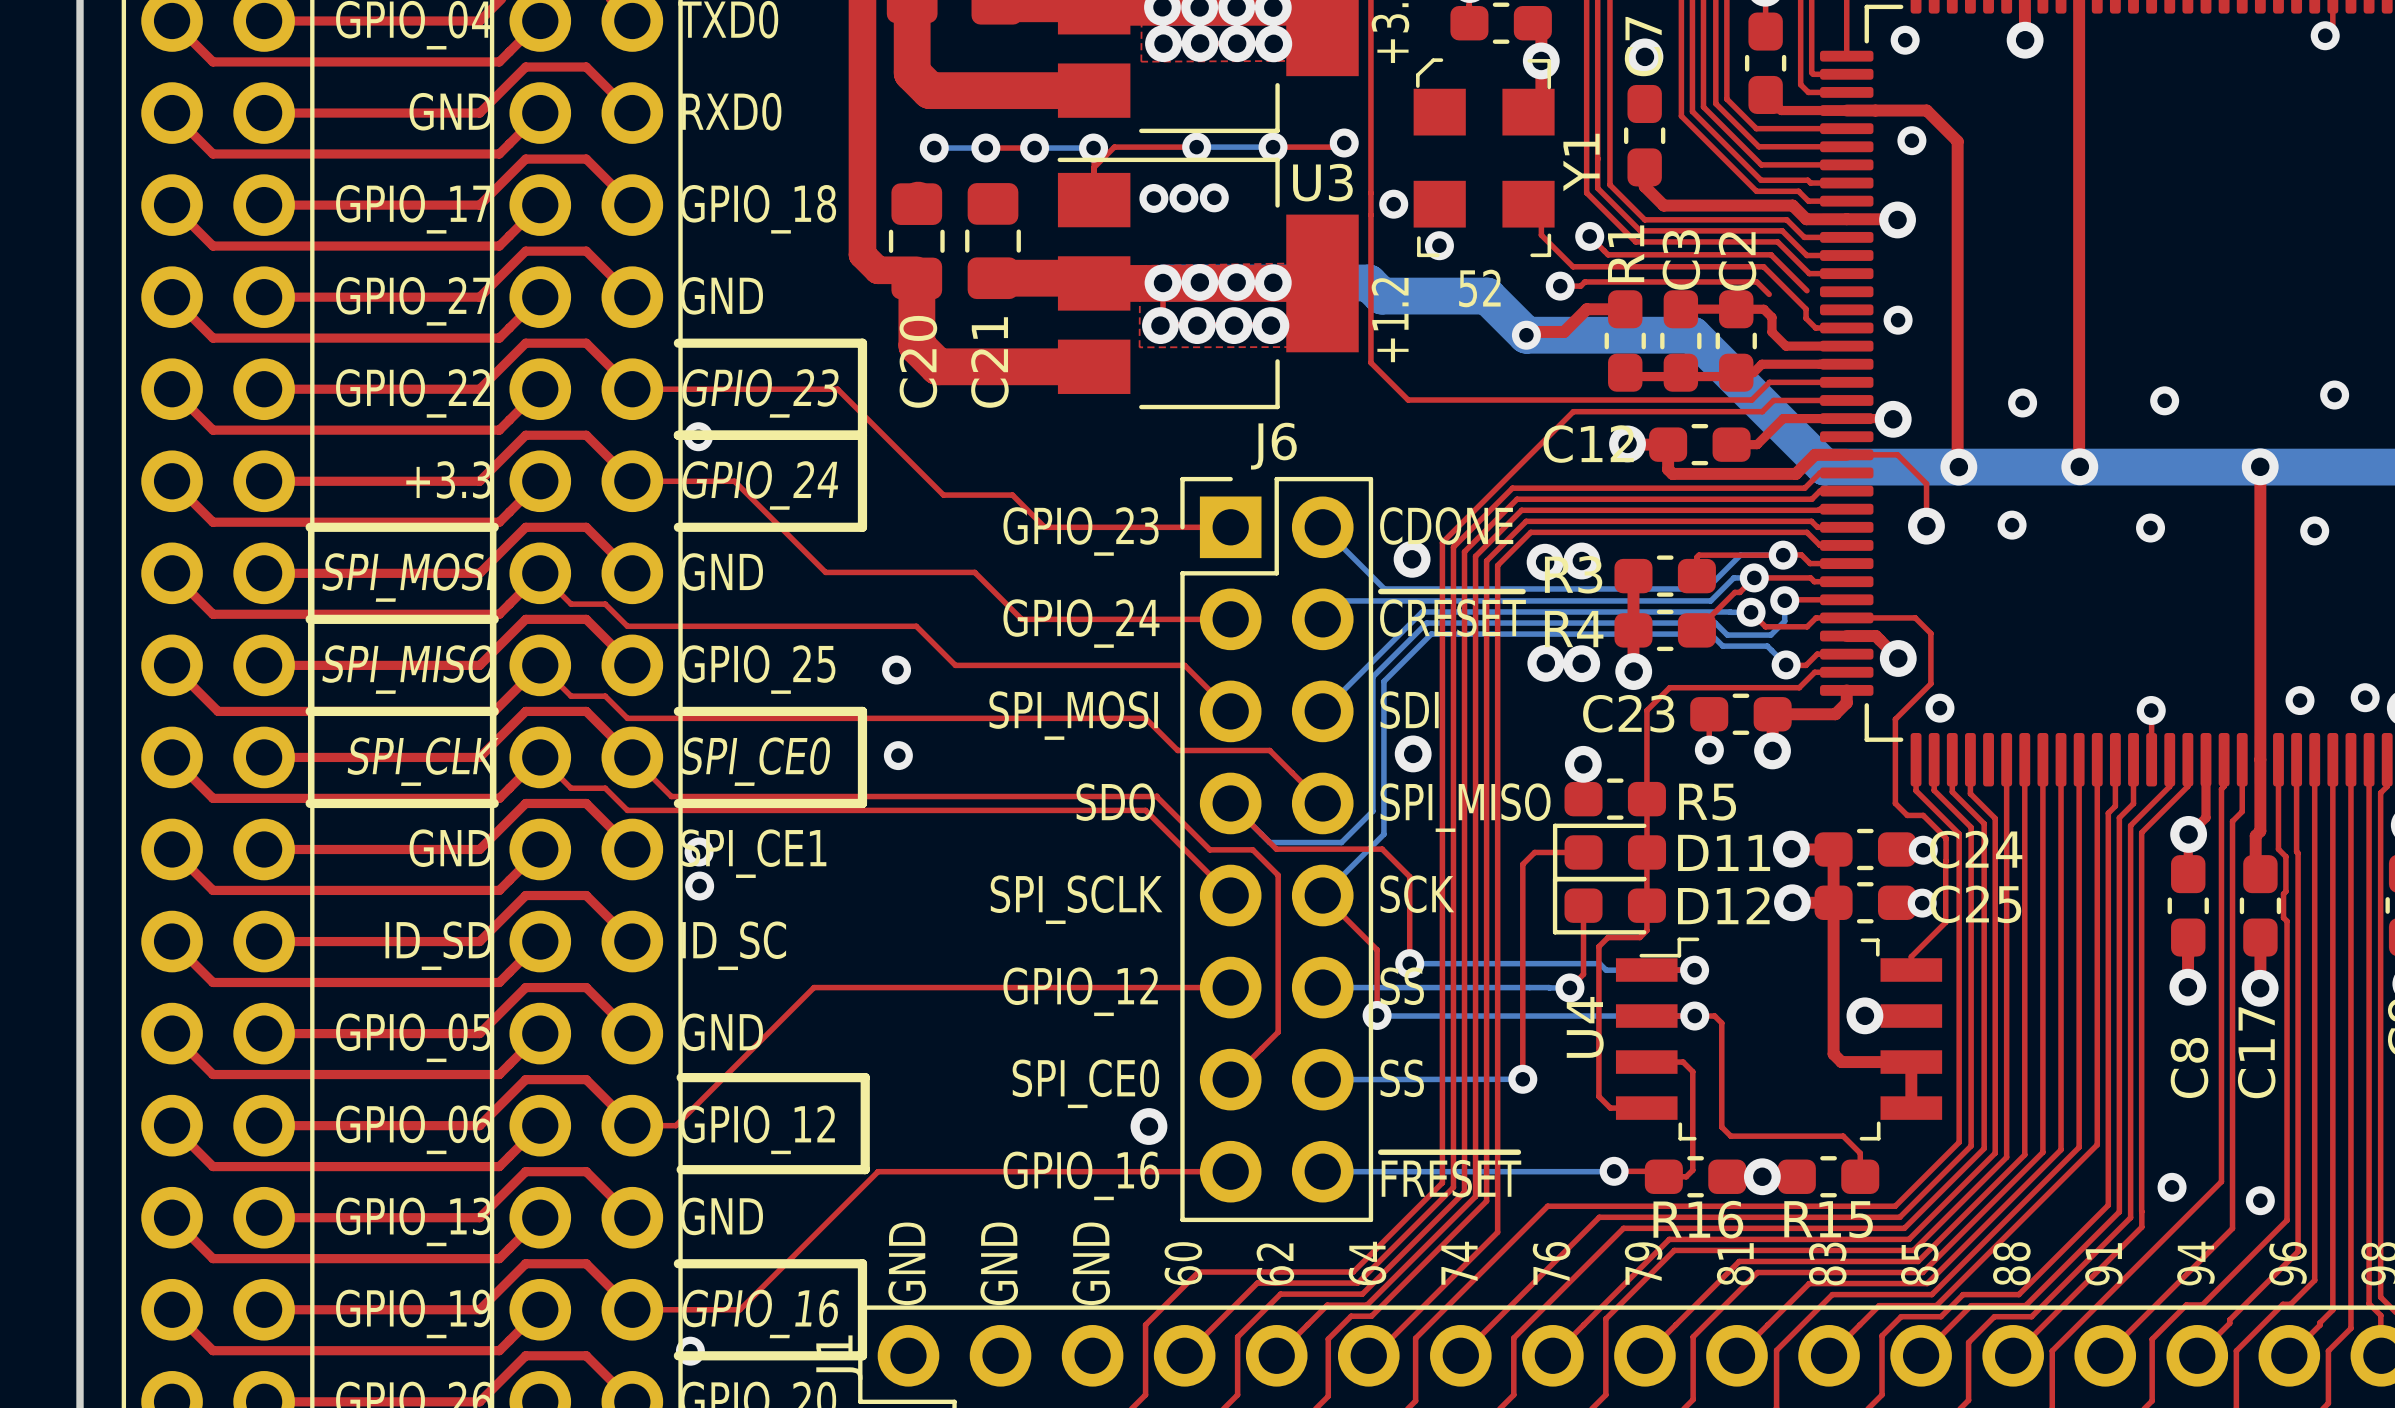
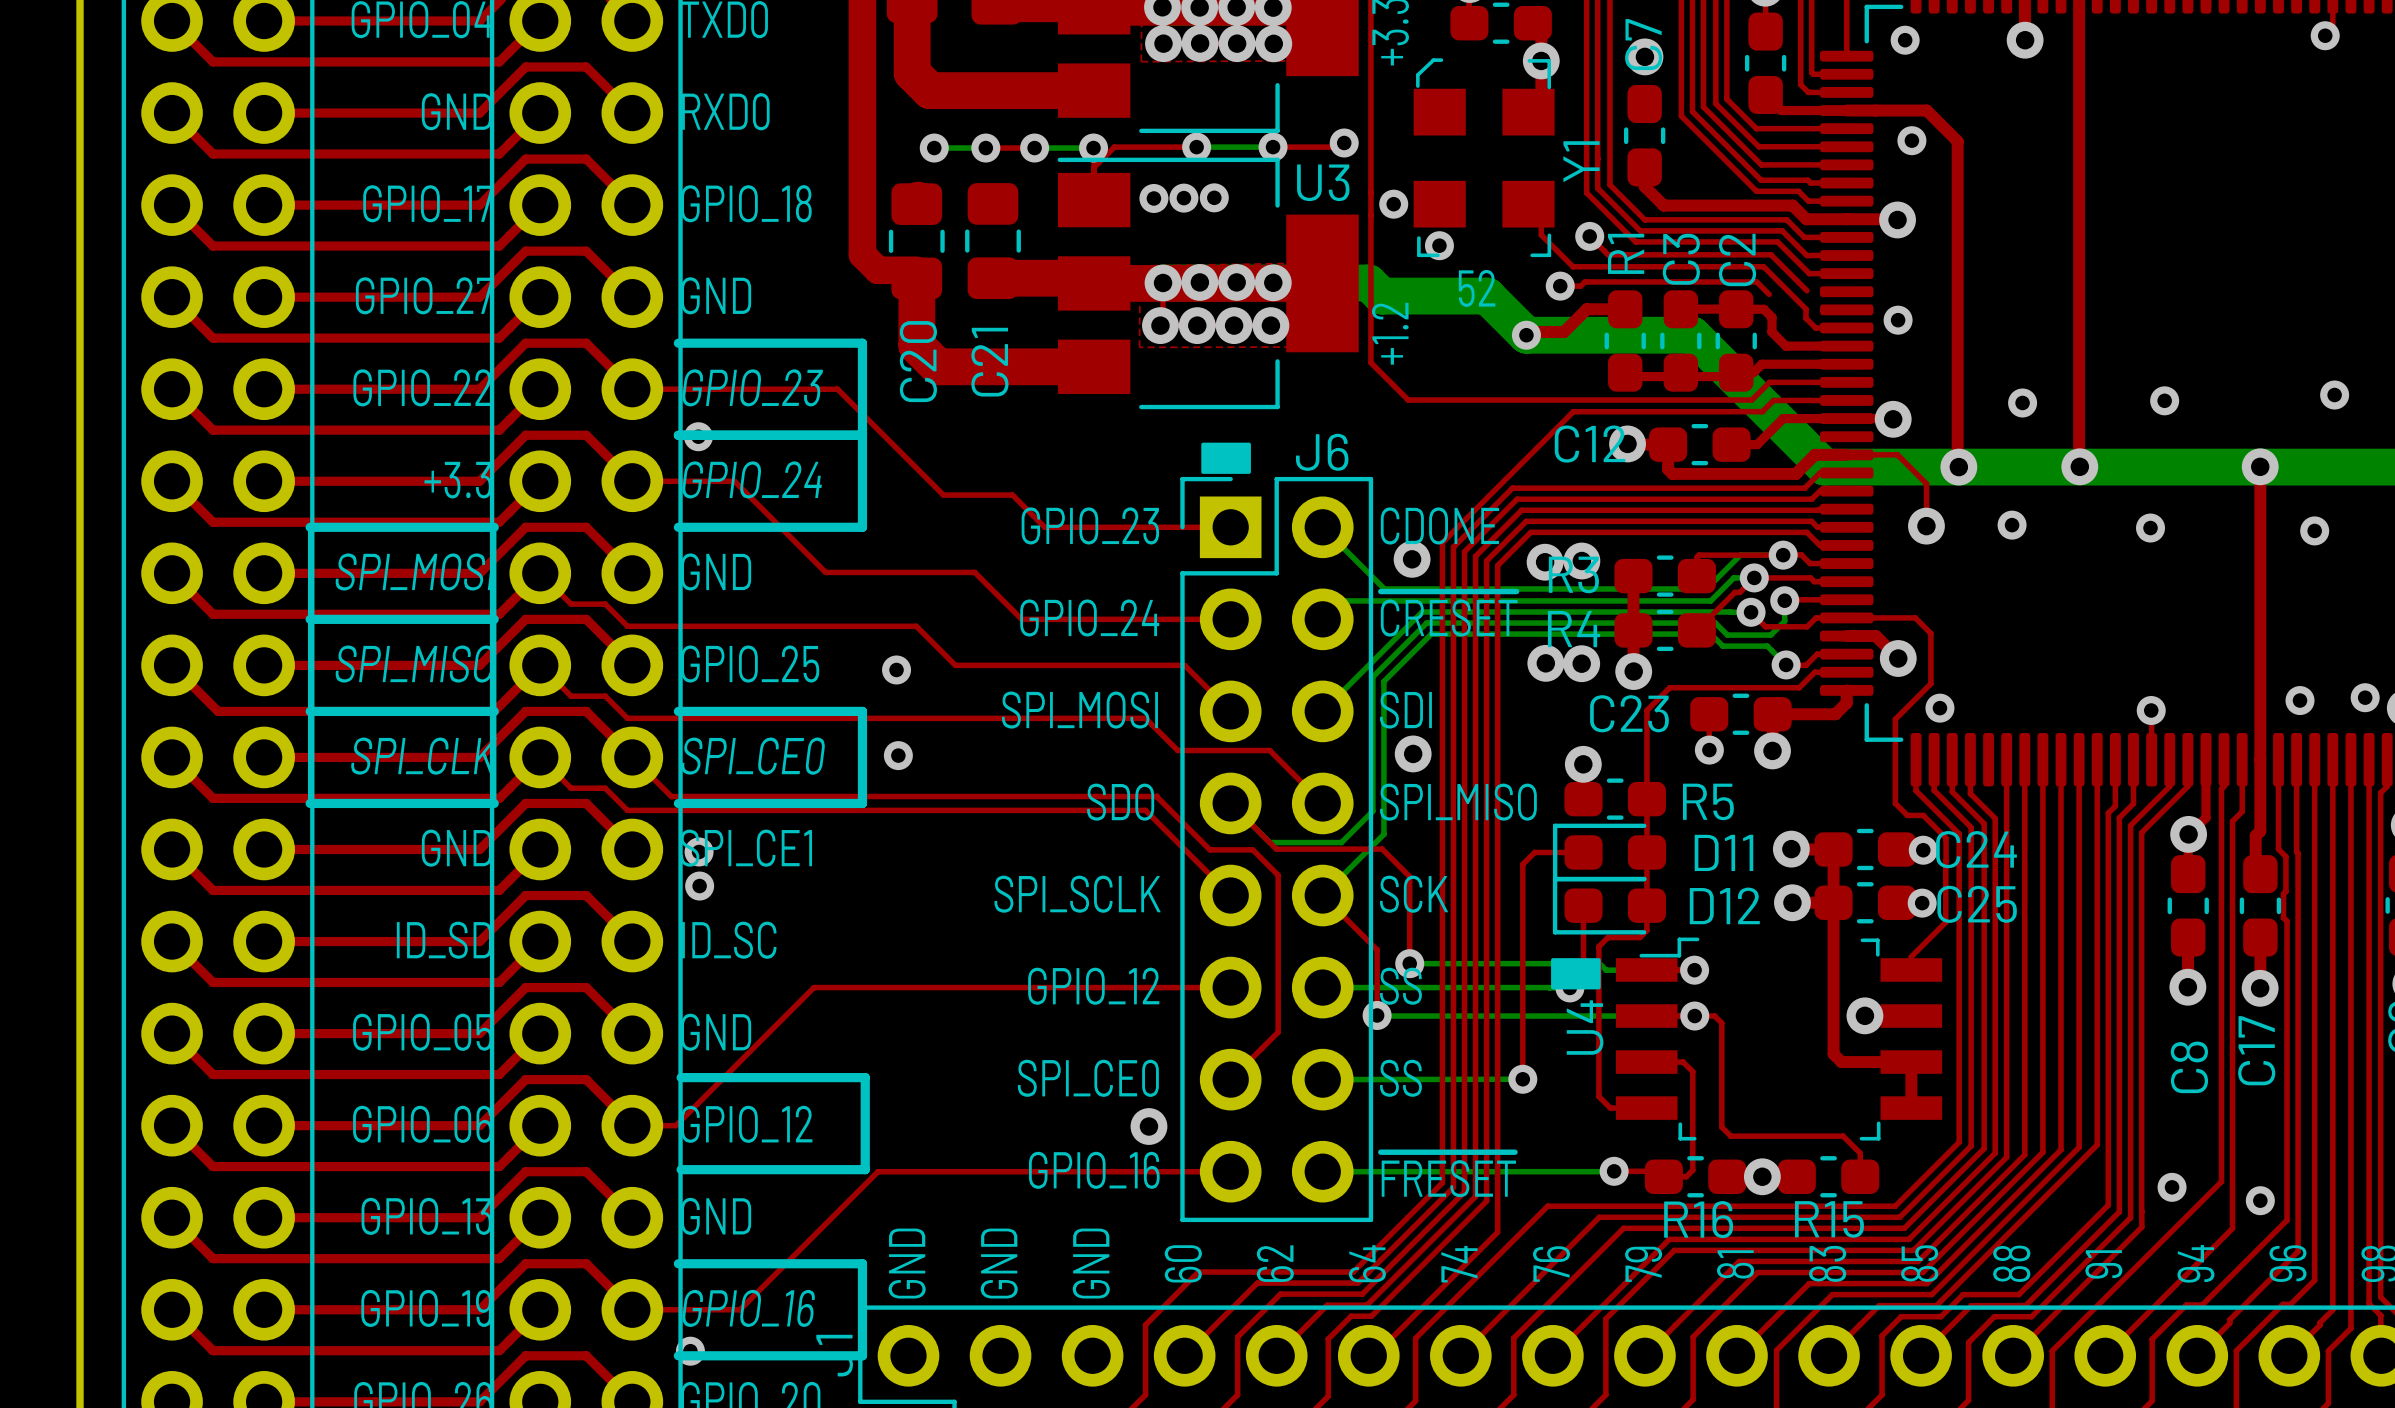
drawing: none -> [1201, 442, 1251, 474]
J6 name position: J6 (1273, 446) -> J6 (1322, 452)
drawing: none -> [1551, 958, 1601, 990]

